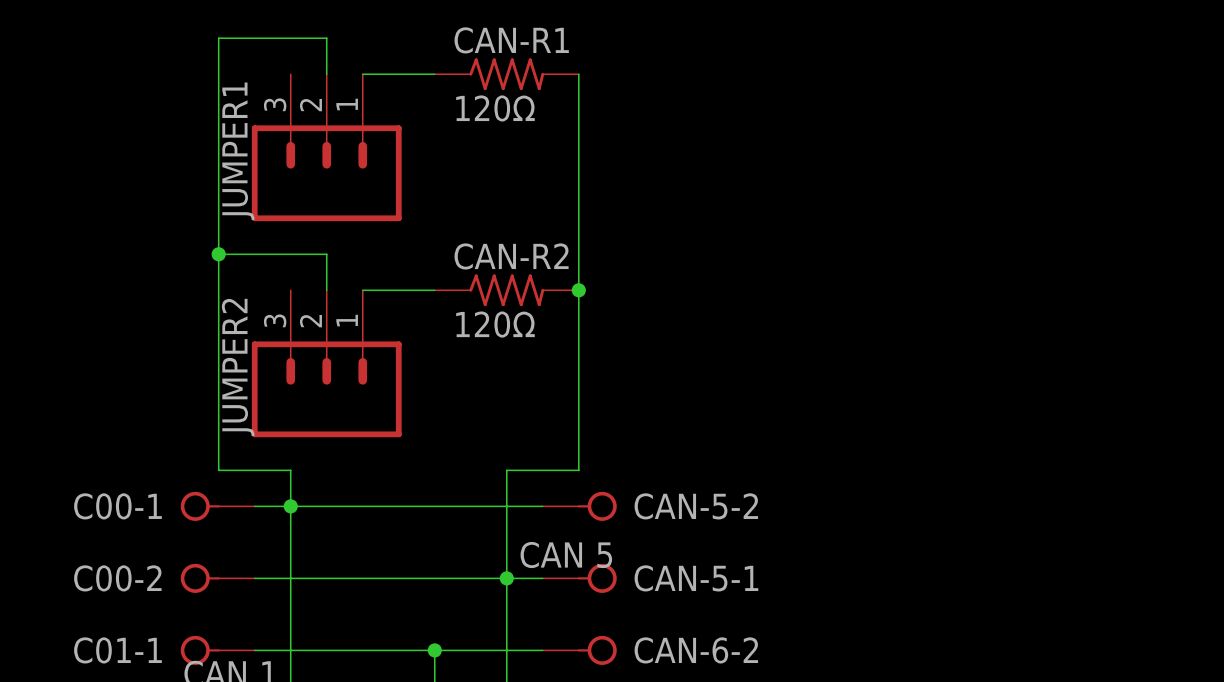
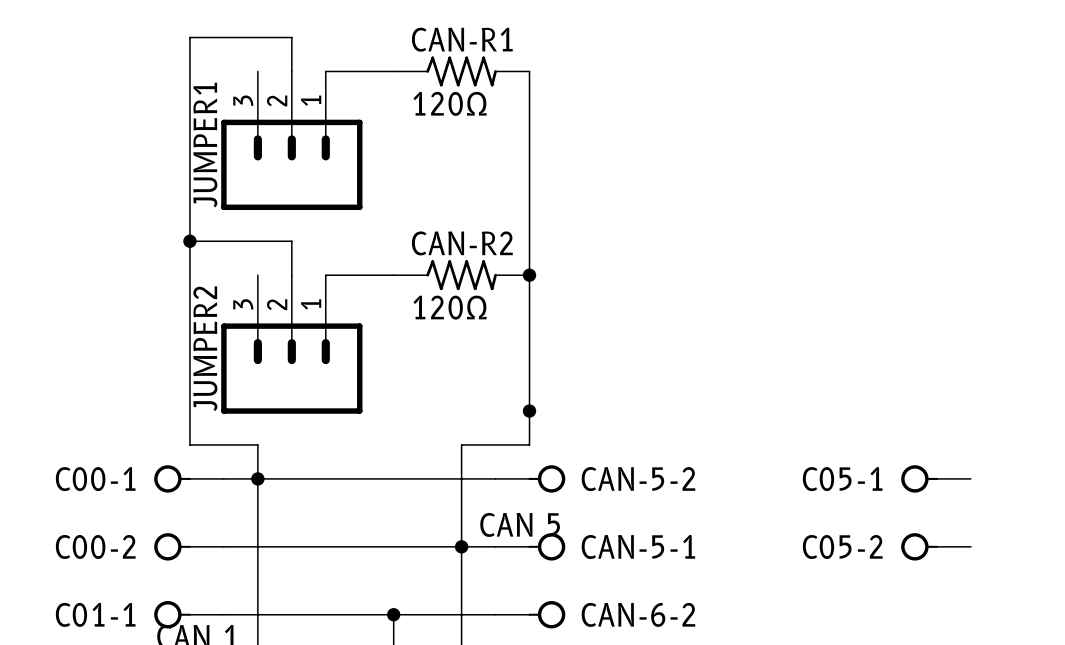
junction: none -> (529, 411)
C05-1: none -> (936, 478)
C05-2: none -> (936, 546)

